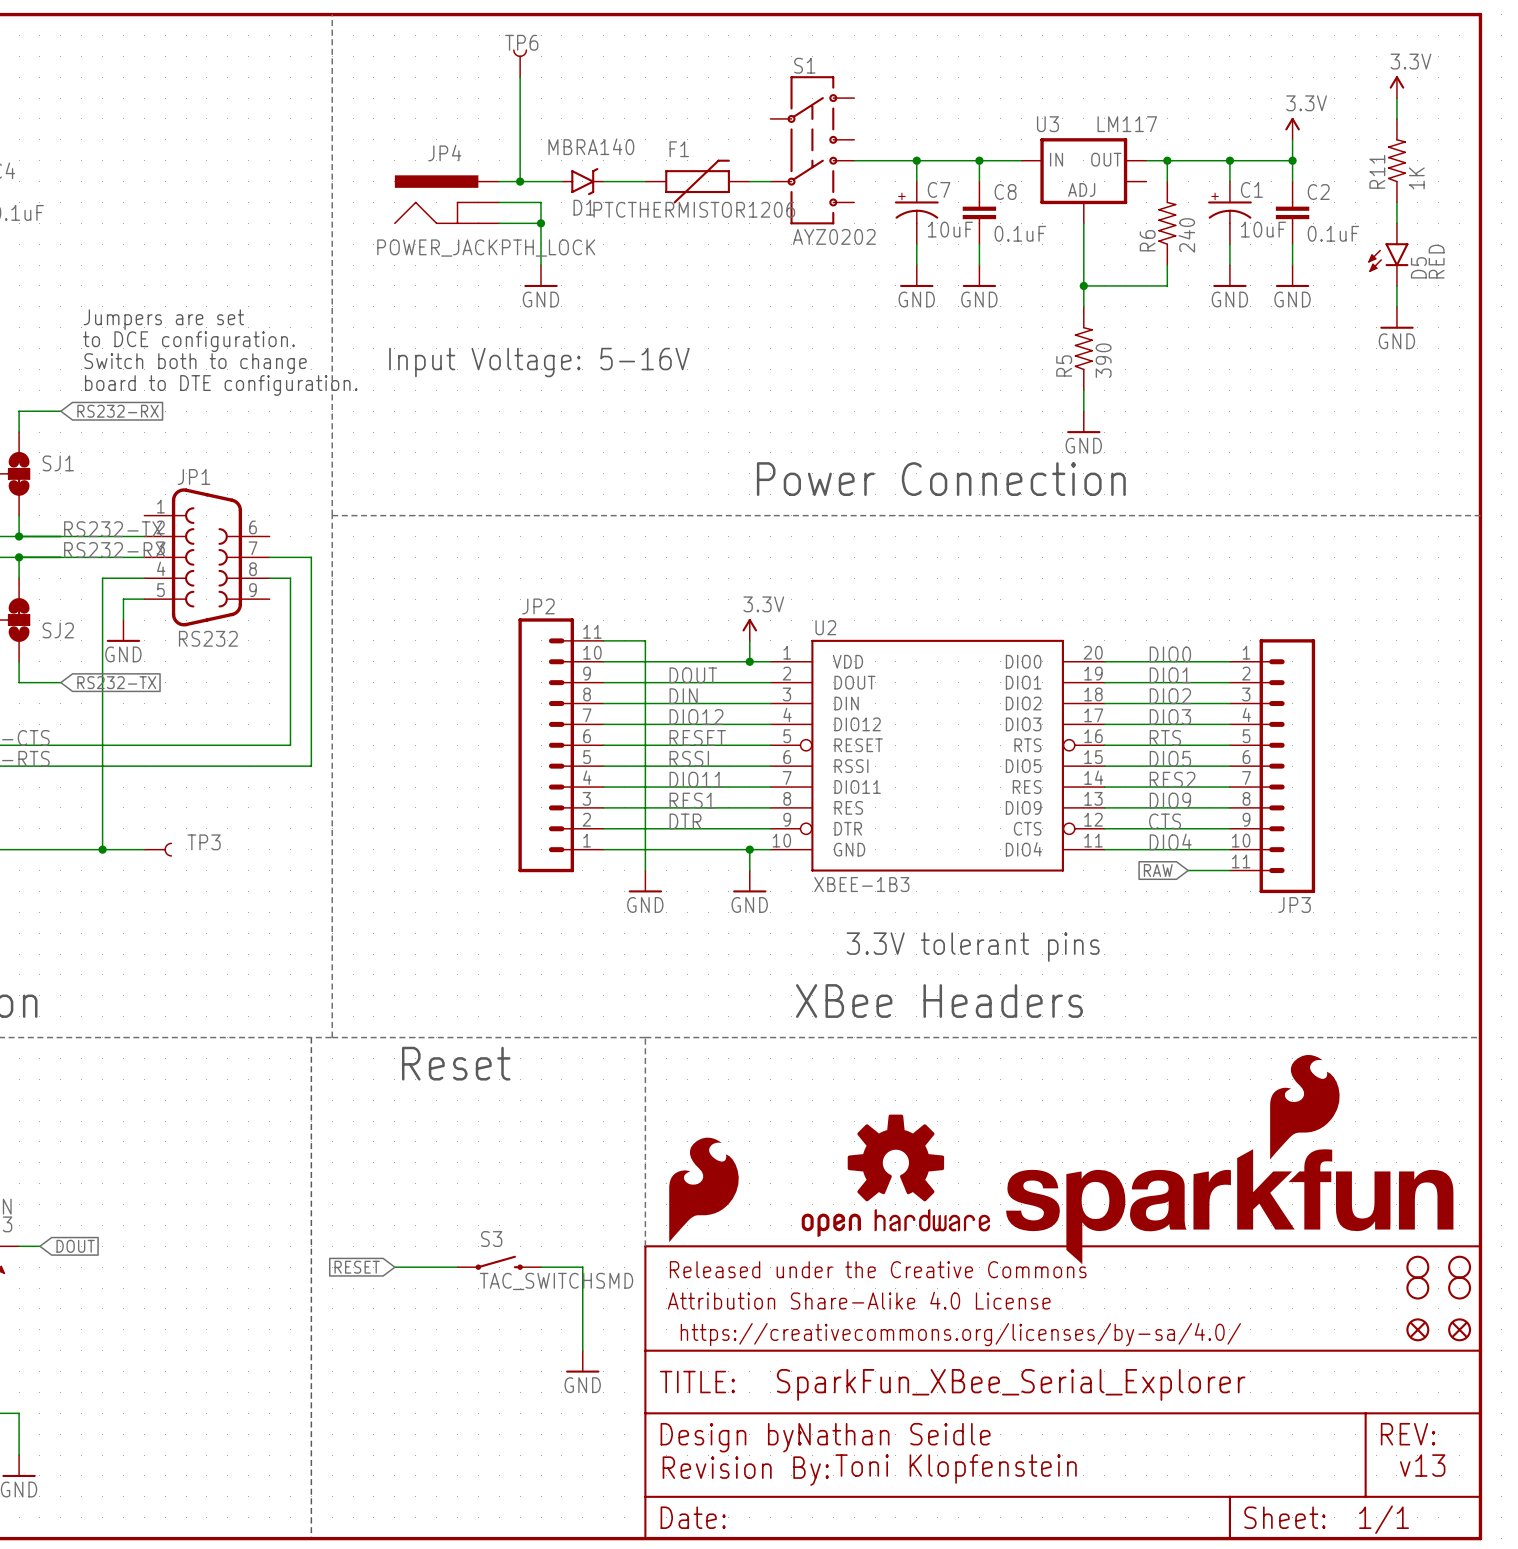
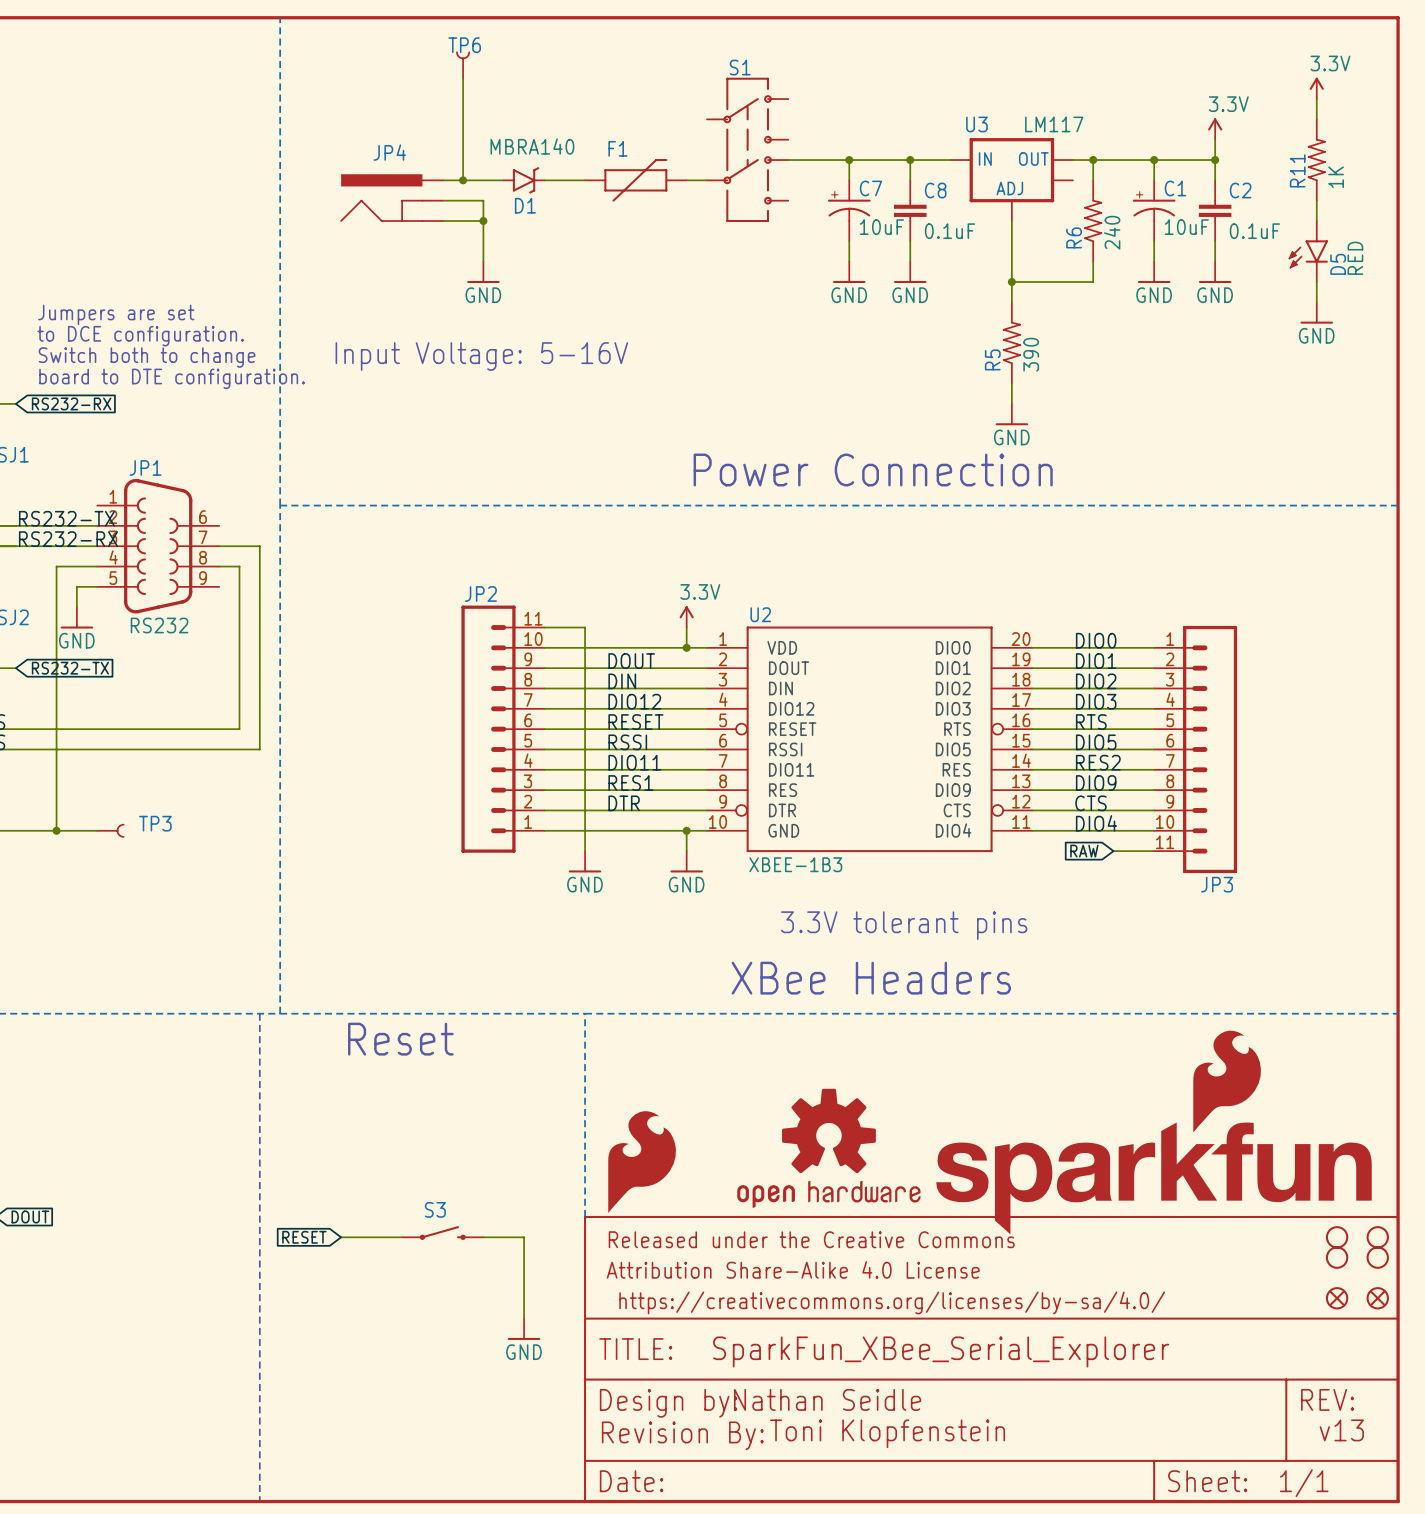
F1 value: PTCTHERMISTOR1206 (694, 209) -> none
S1 value: AYZ0202 (834, 236) -> none
JP4 value: POWER_JACKPTH_LOCK (486, 248) -> none
S3 value: TAC_SWITCHSMD (556, 1281) -> none

